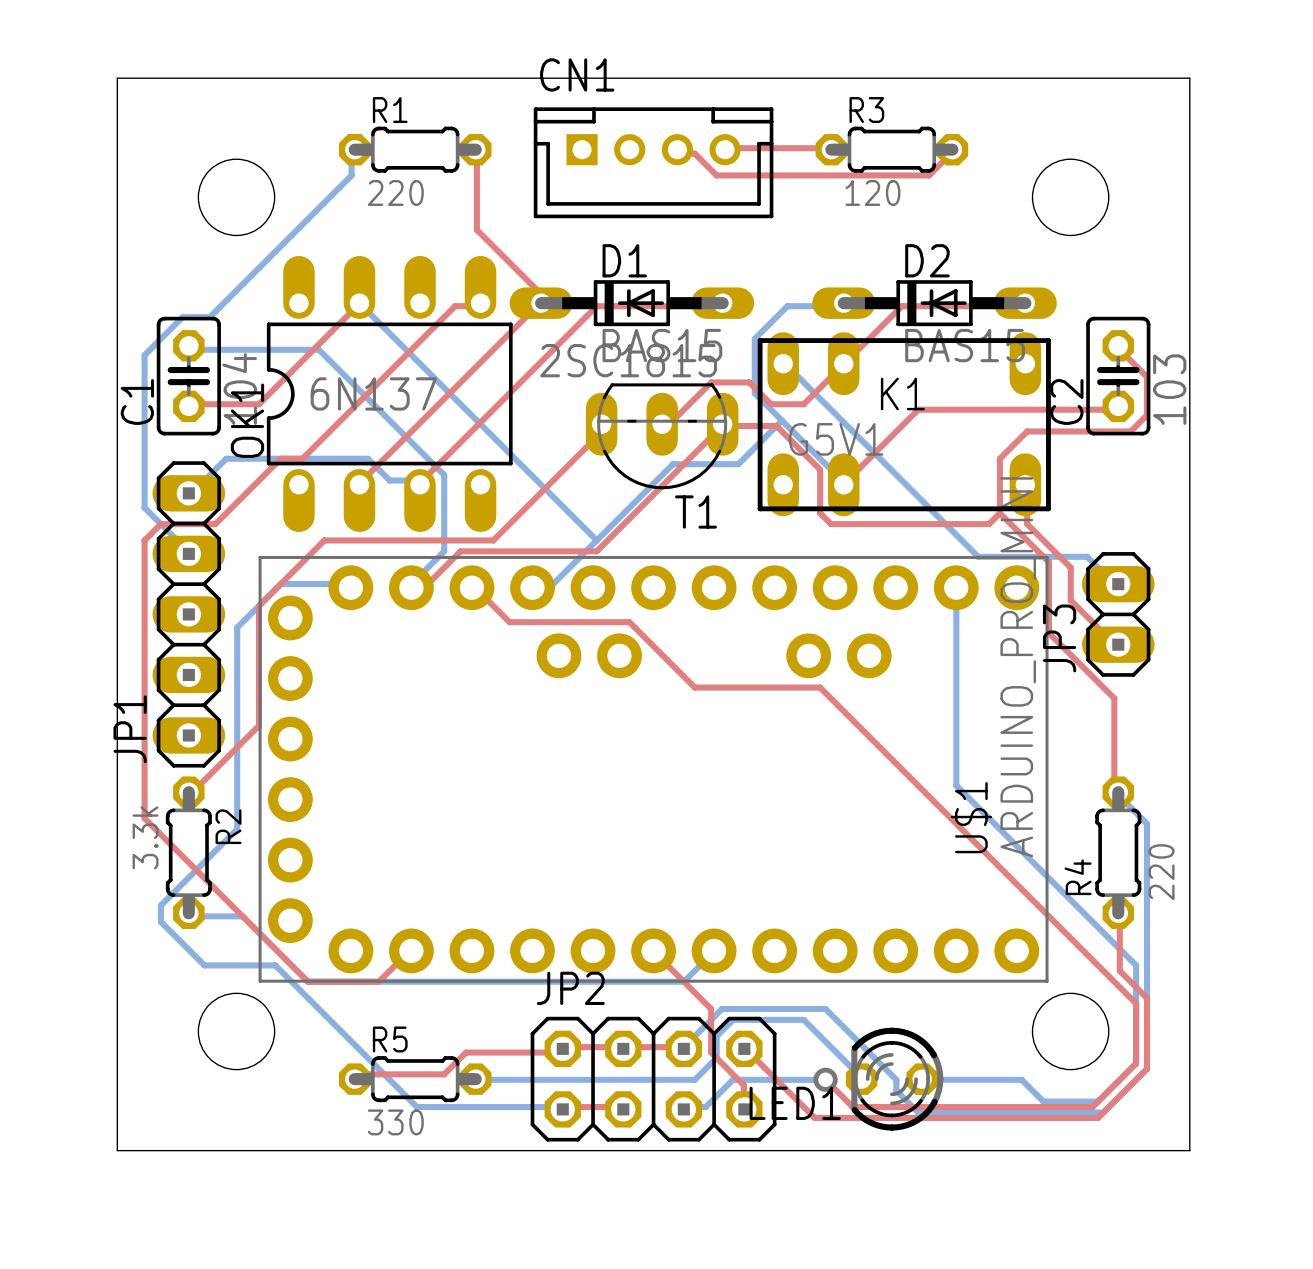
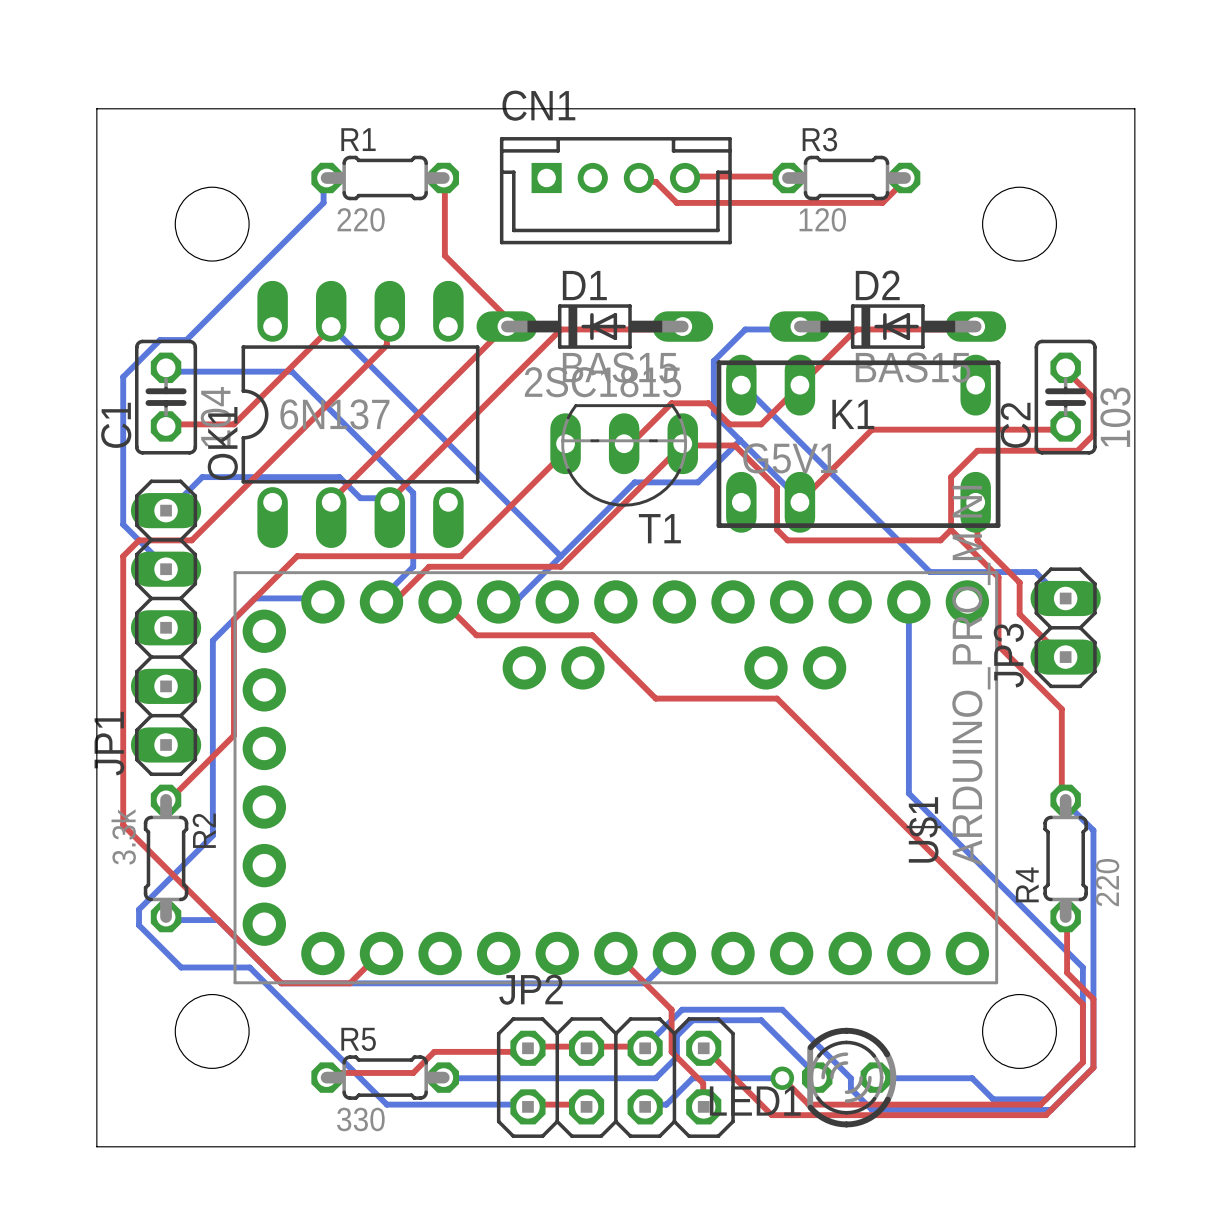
top track: (480, 303) (476, 306) (455, 306) (302, 458) (280, 458) -> (389, 326) (386, 329) (386, 345) (255, 477)

